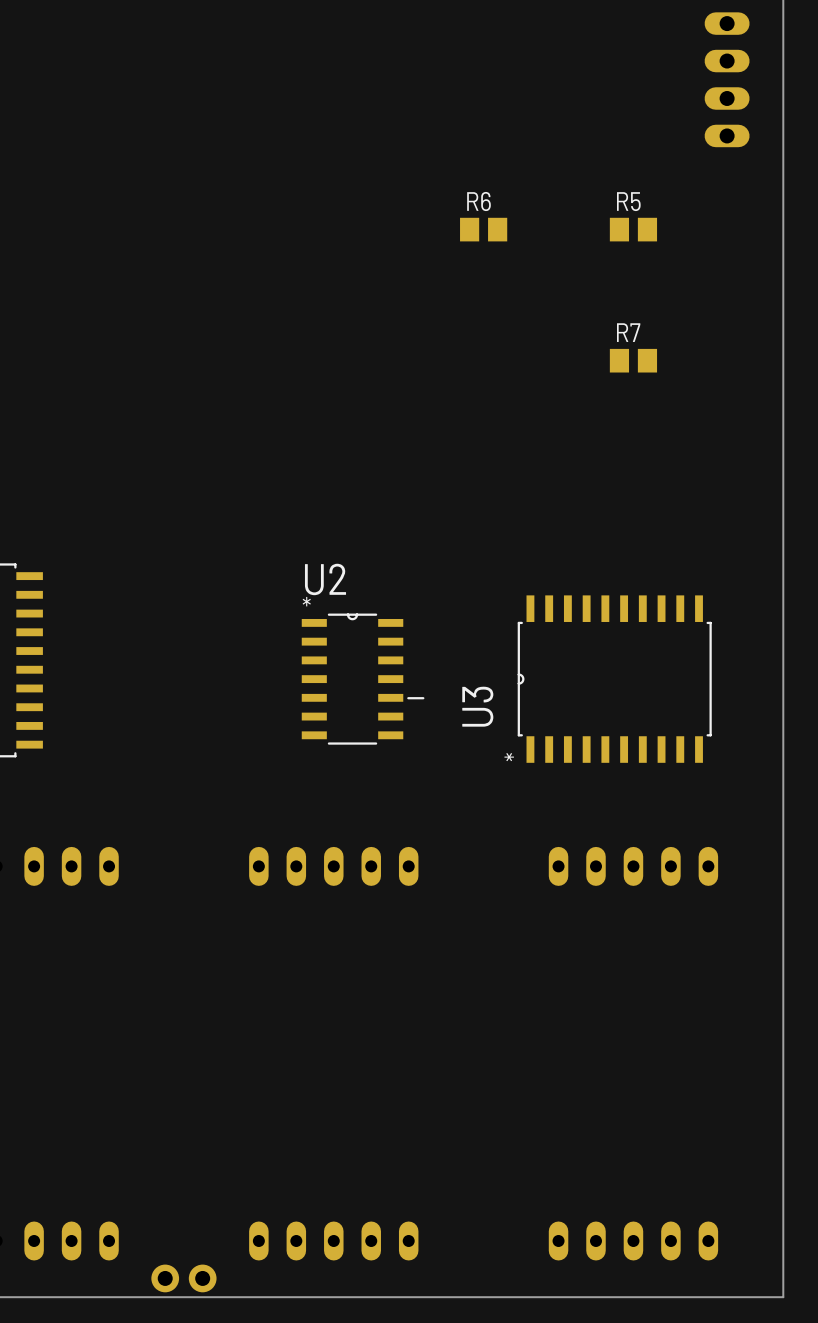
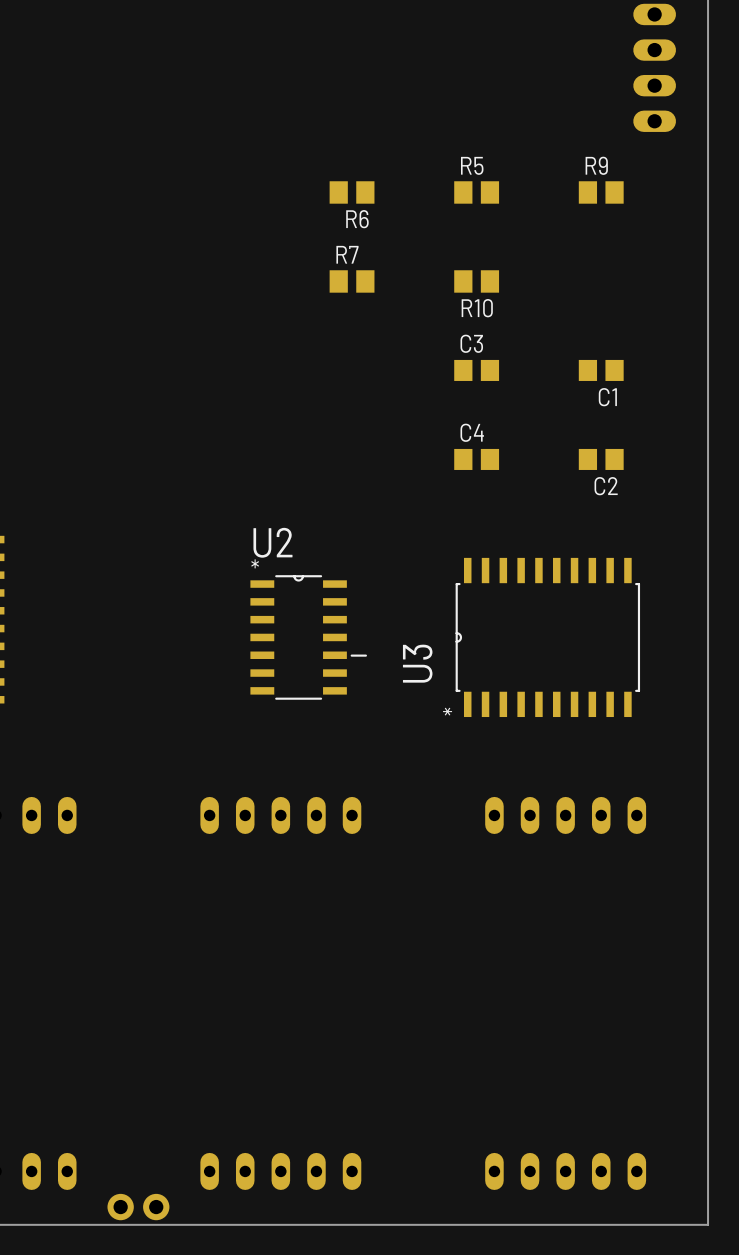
R6 name position: R6 (478, 201) -> R6 (357, 219)
R9: none -> (601, 192)
R6 position: (483, 229) -> (352, 192)
R5 position: (633, 229) -> (476, 192)
R10: none -> (476, 281)
R7 position: (633, 360) -> (352, 281)
C3: none -> (476, 370)
C1: none -> (601, 370)
C4: none -> (476, 459)
C2: none -> (601, 459)

